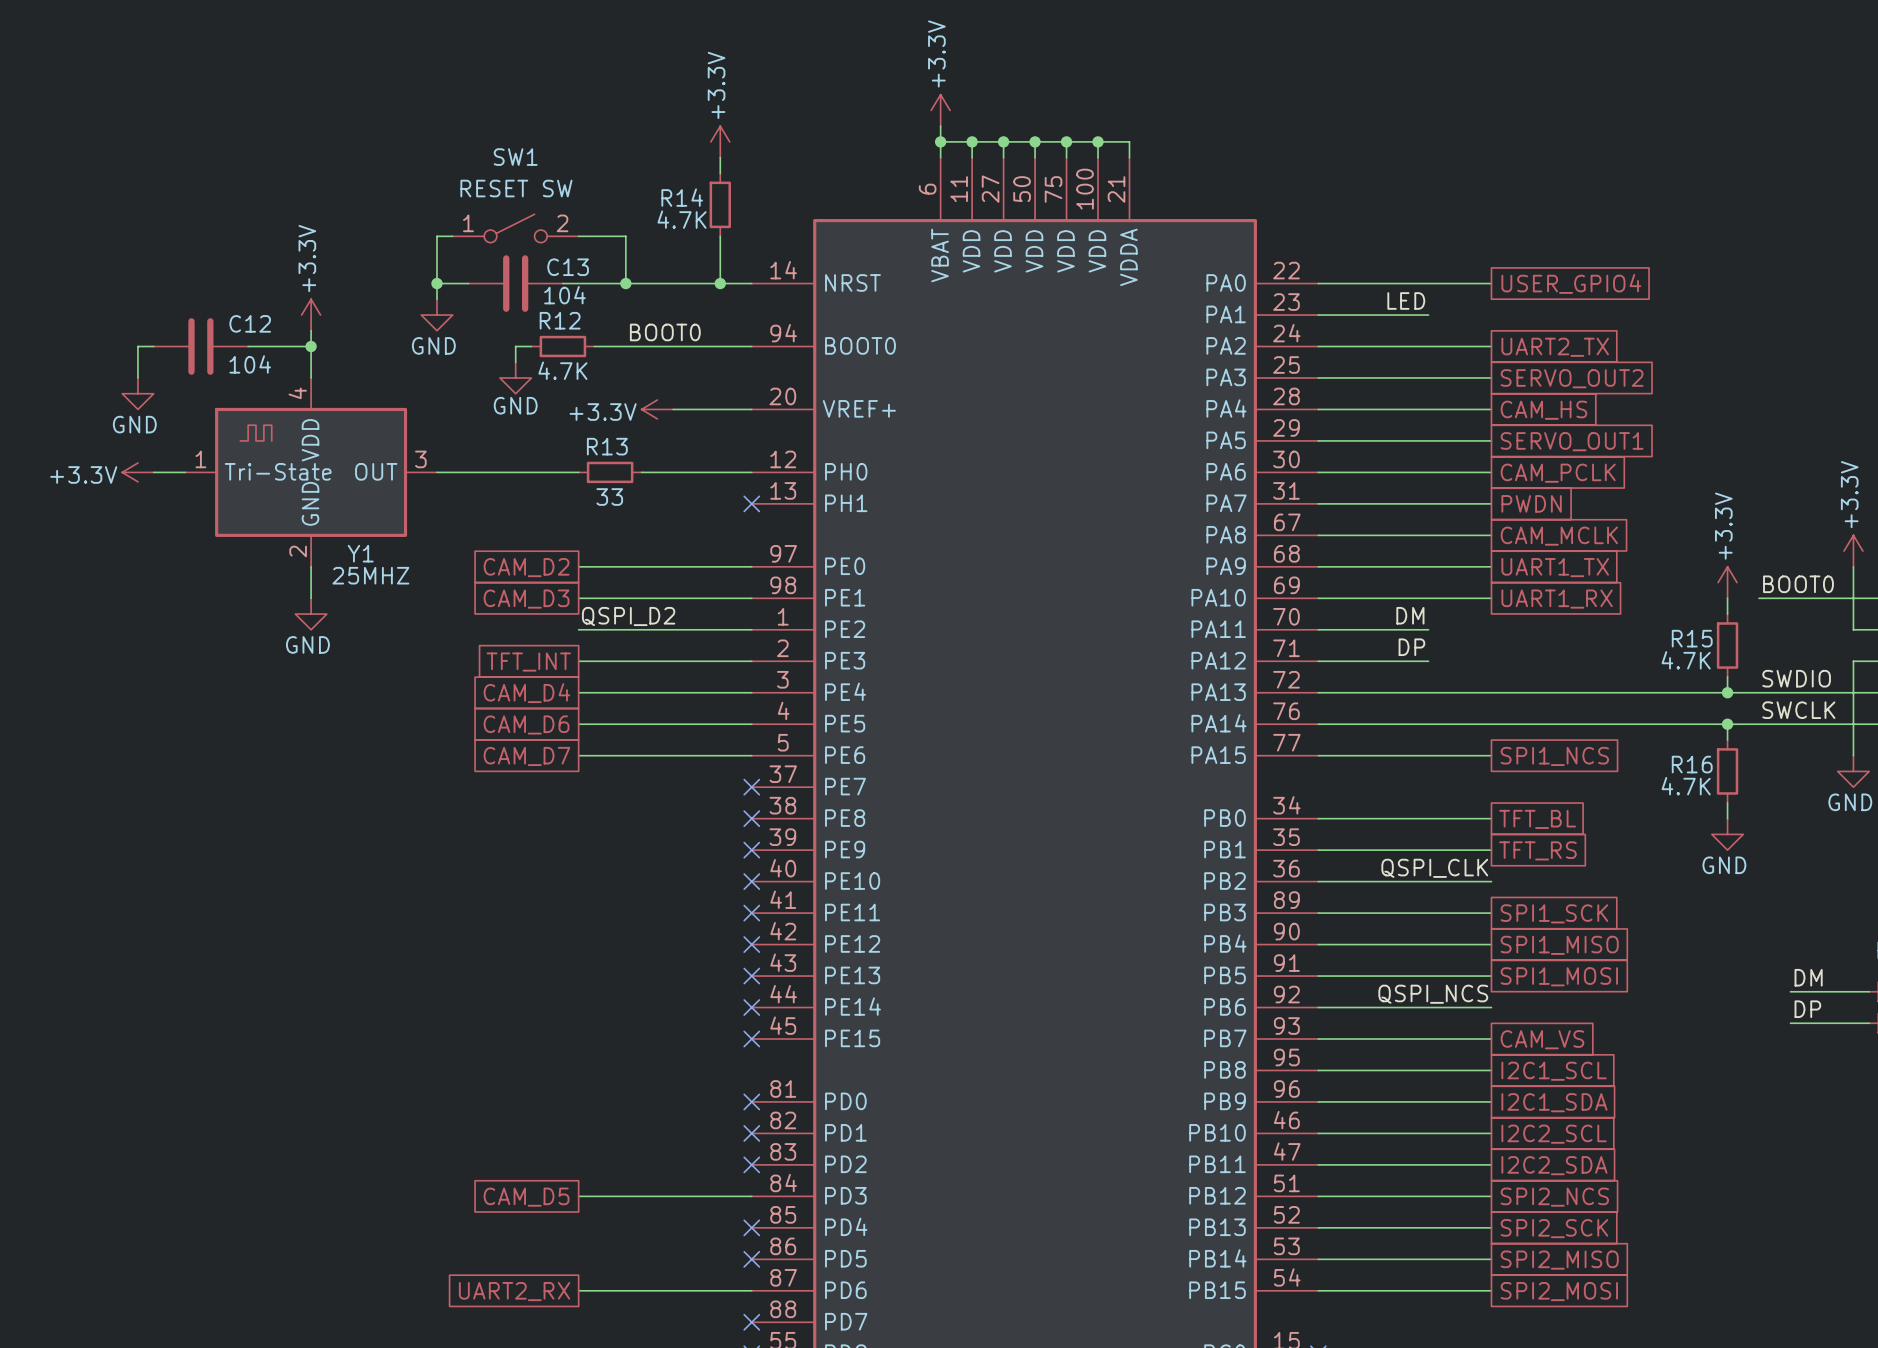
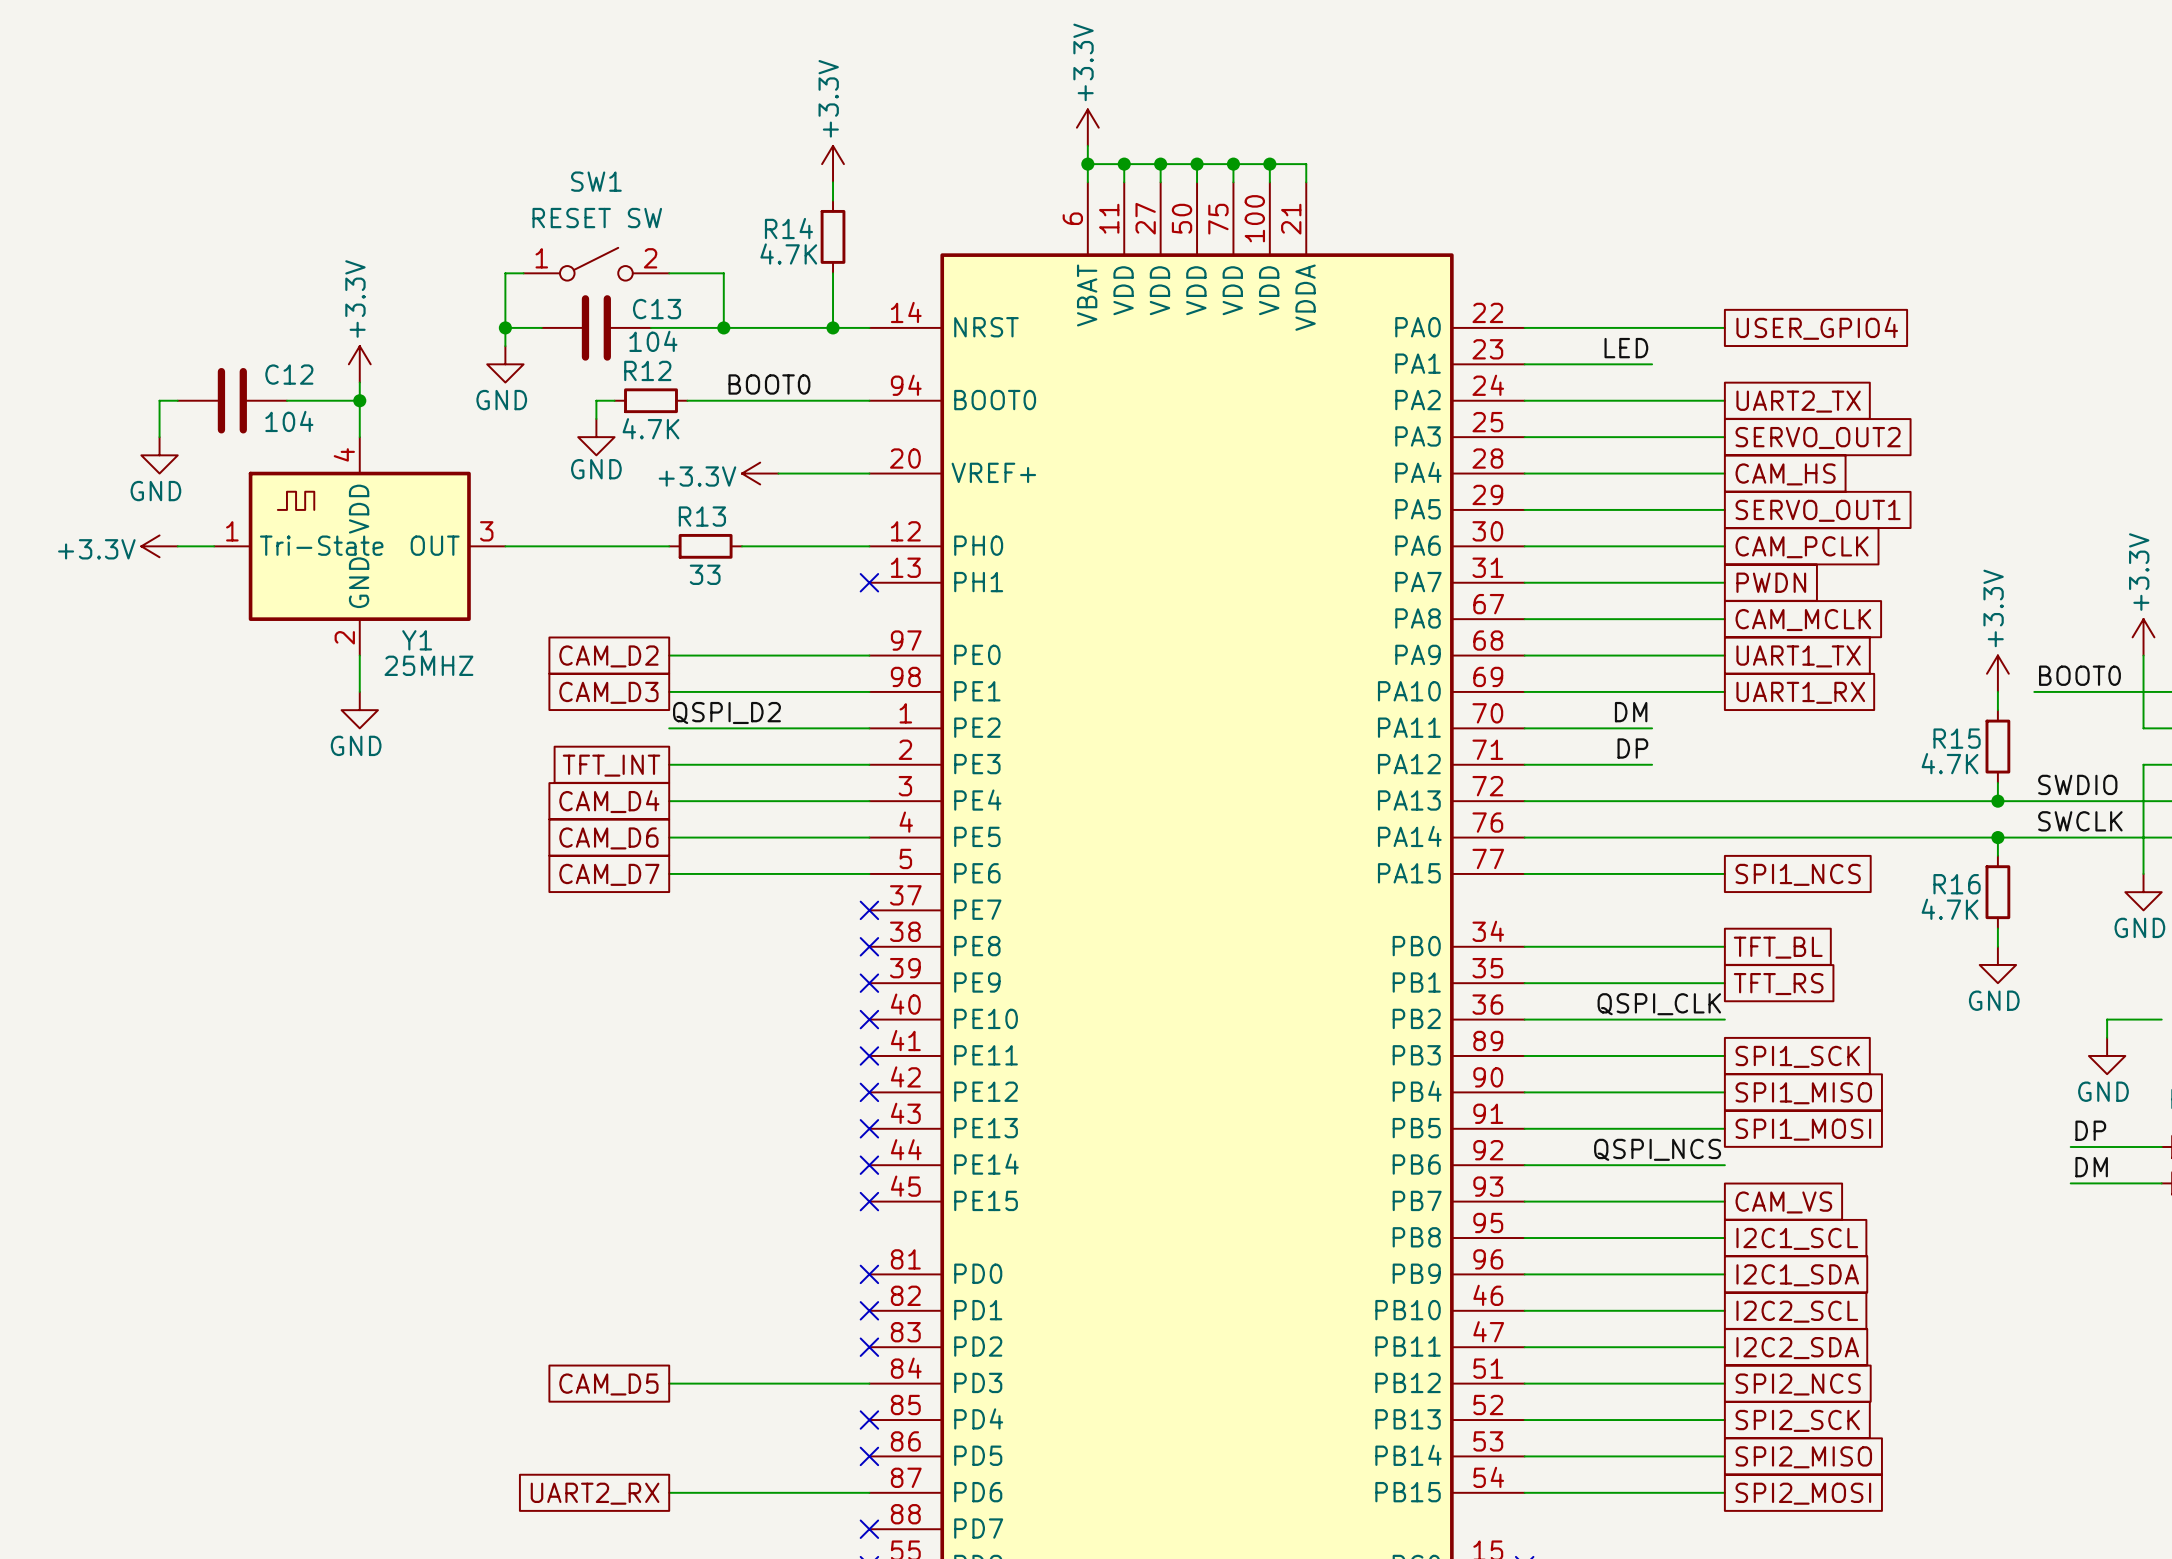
wire: none -> (2161, 1019) (2107, 1019) (2107, 1037)
power symbol: none -> GND (2107, 1055)
label: DM (1808, 977) -> DP (2090, 1130)
label: DP (1807, 1009) -> DM (2091, 1167)

